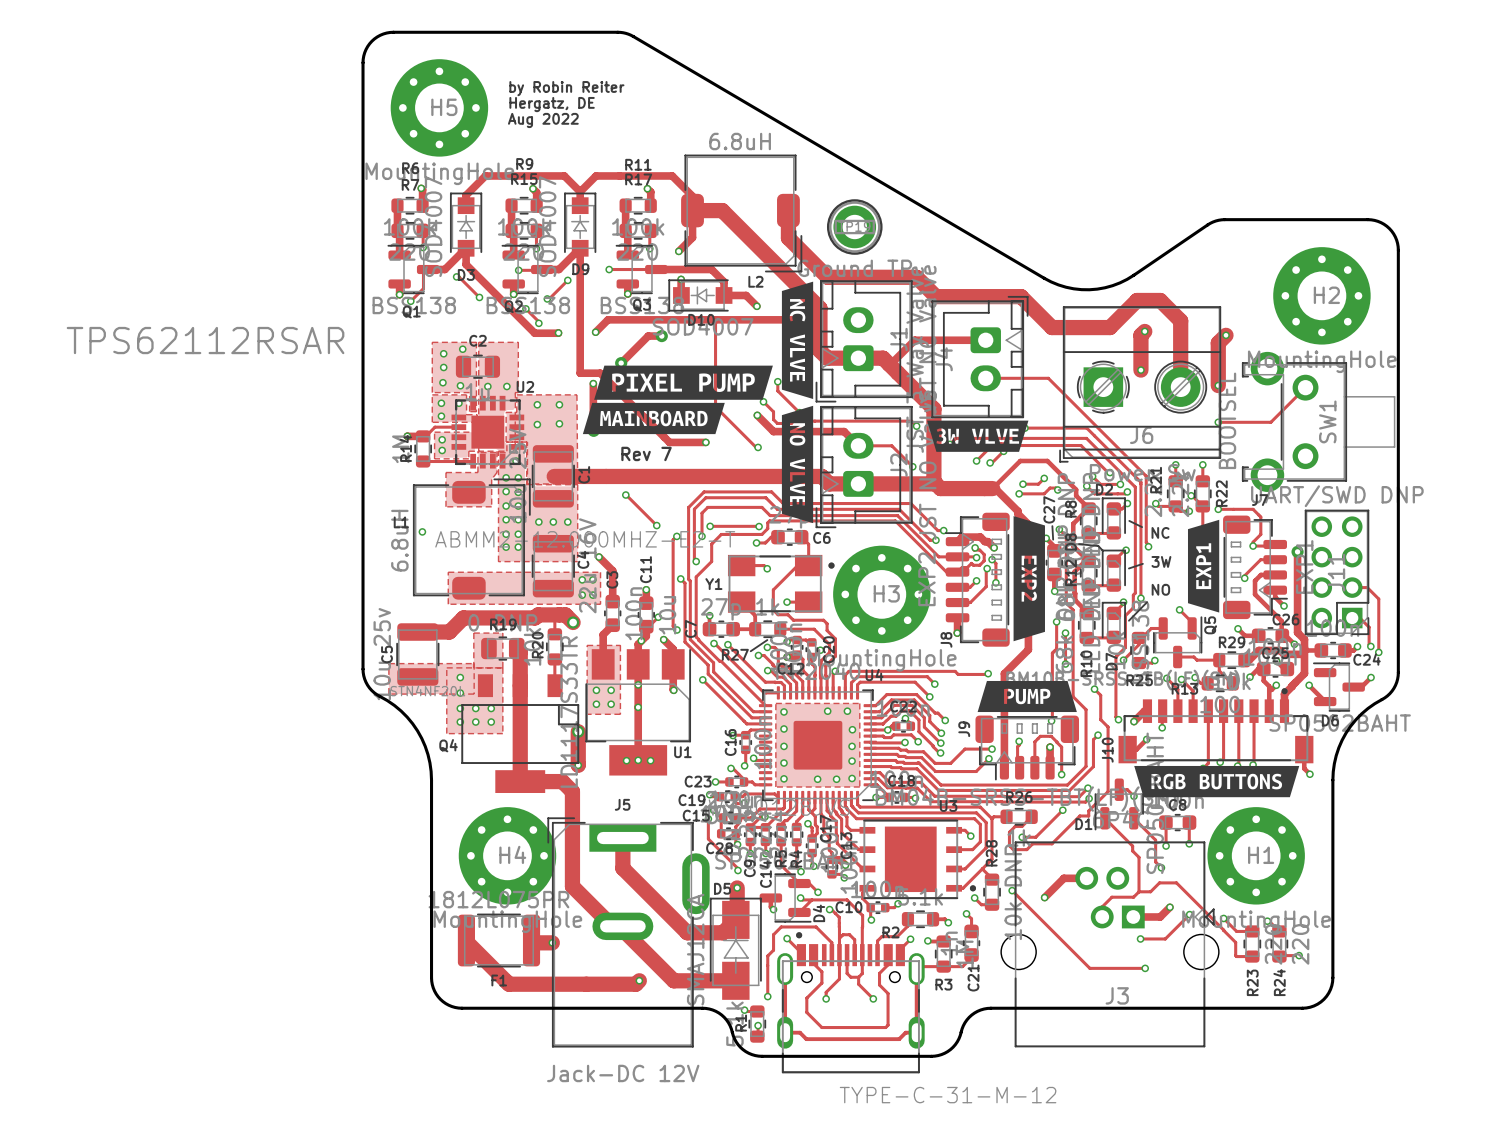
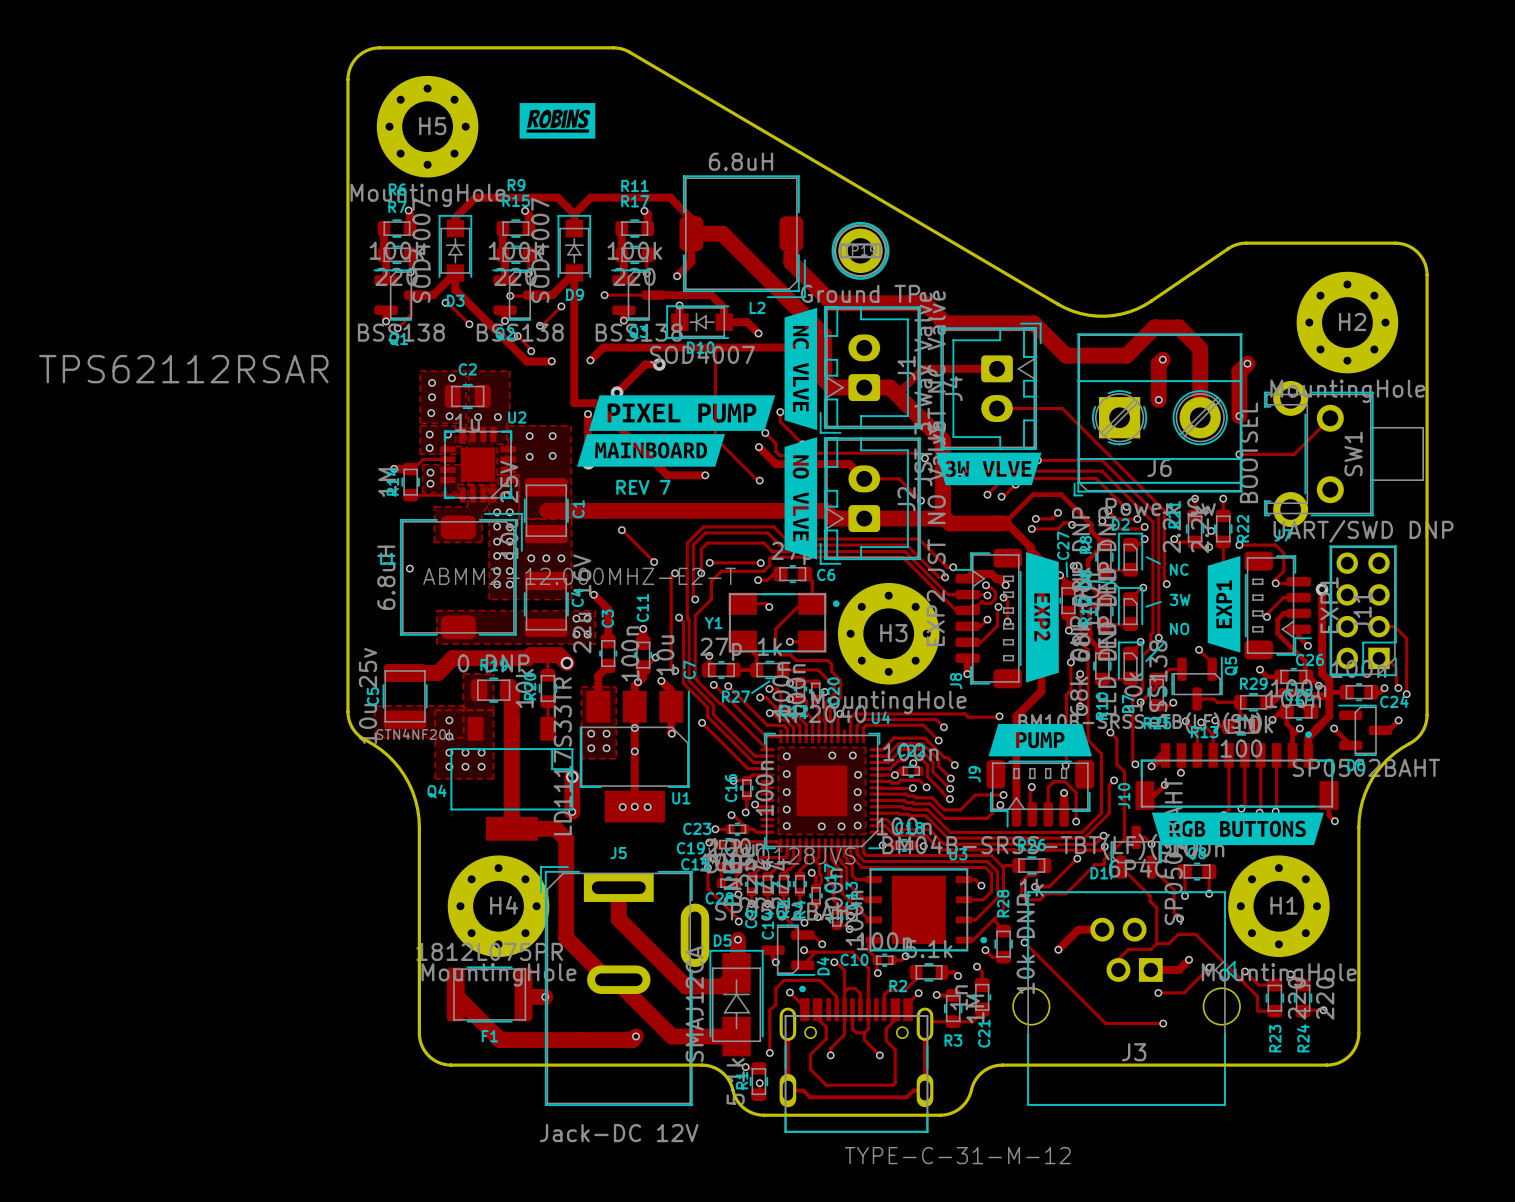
drawing: none -> [519, 103, 596, 139]
text: by Robin Reiter (566, 88) -> none
text: Hergatz, DE (552, 104) -> none
text: Aug 2022 (543, 120) -> none
text: Rev 7 (646, 453) -> REV 7 (643, 487)

